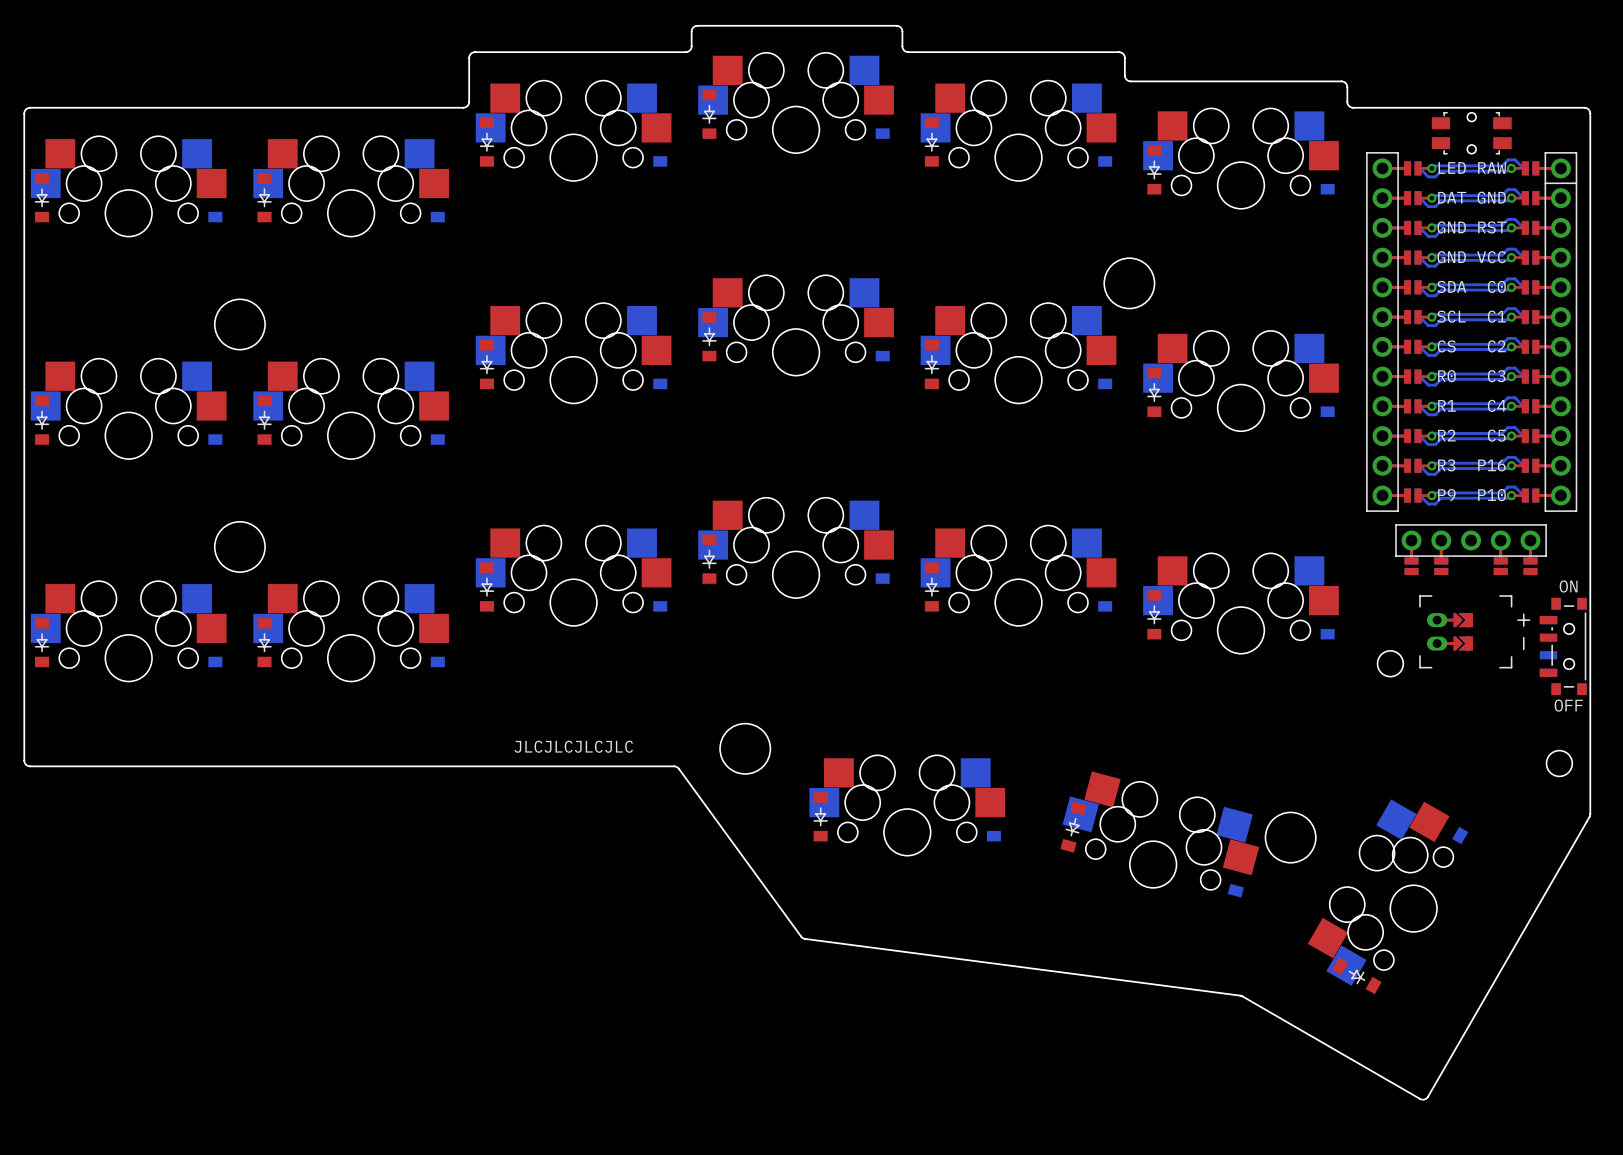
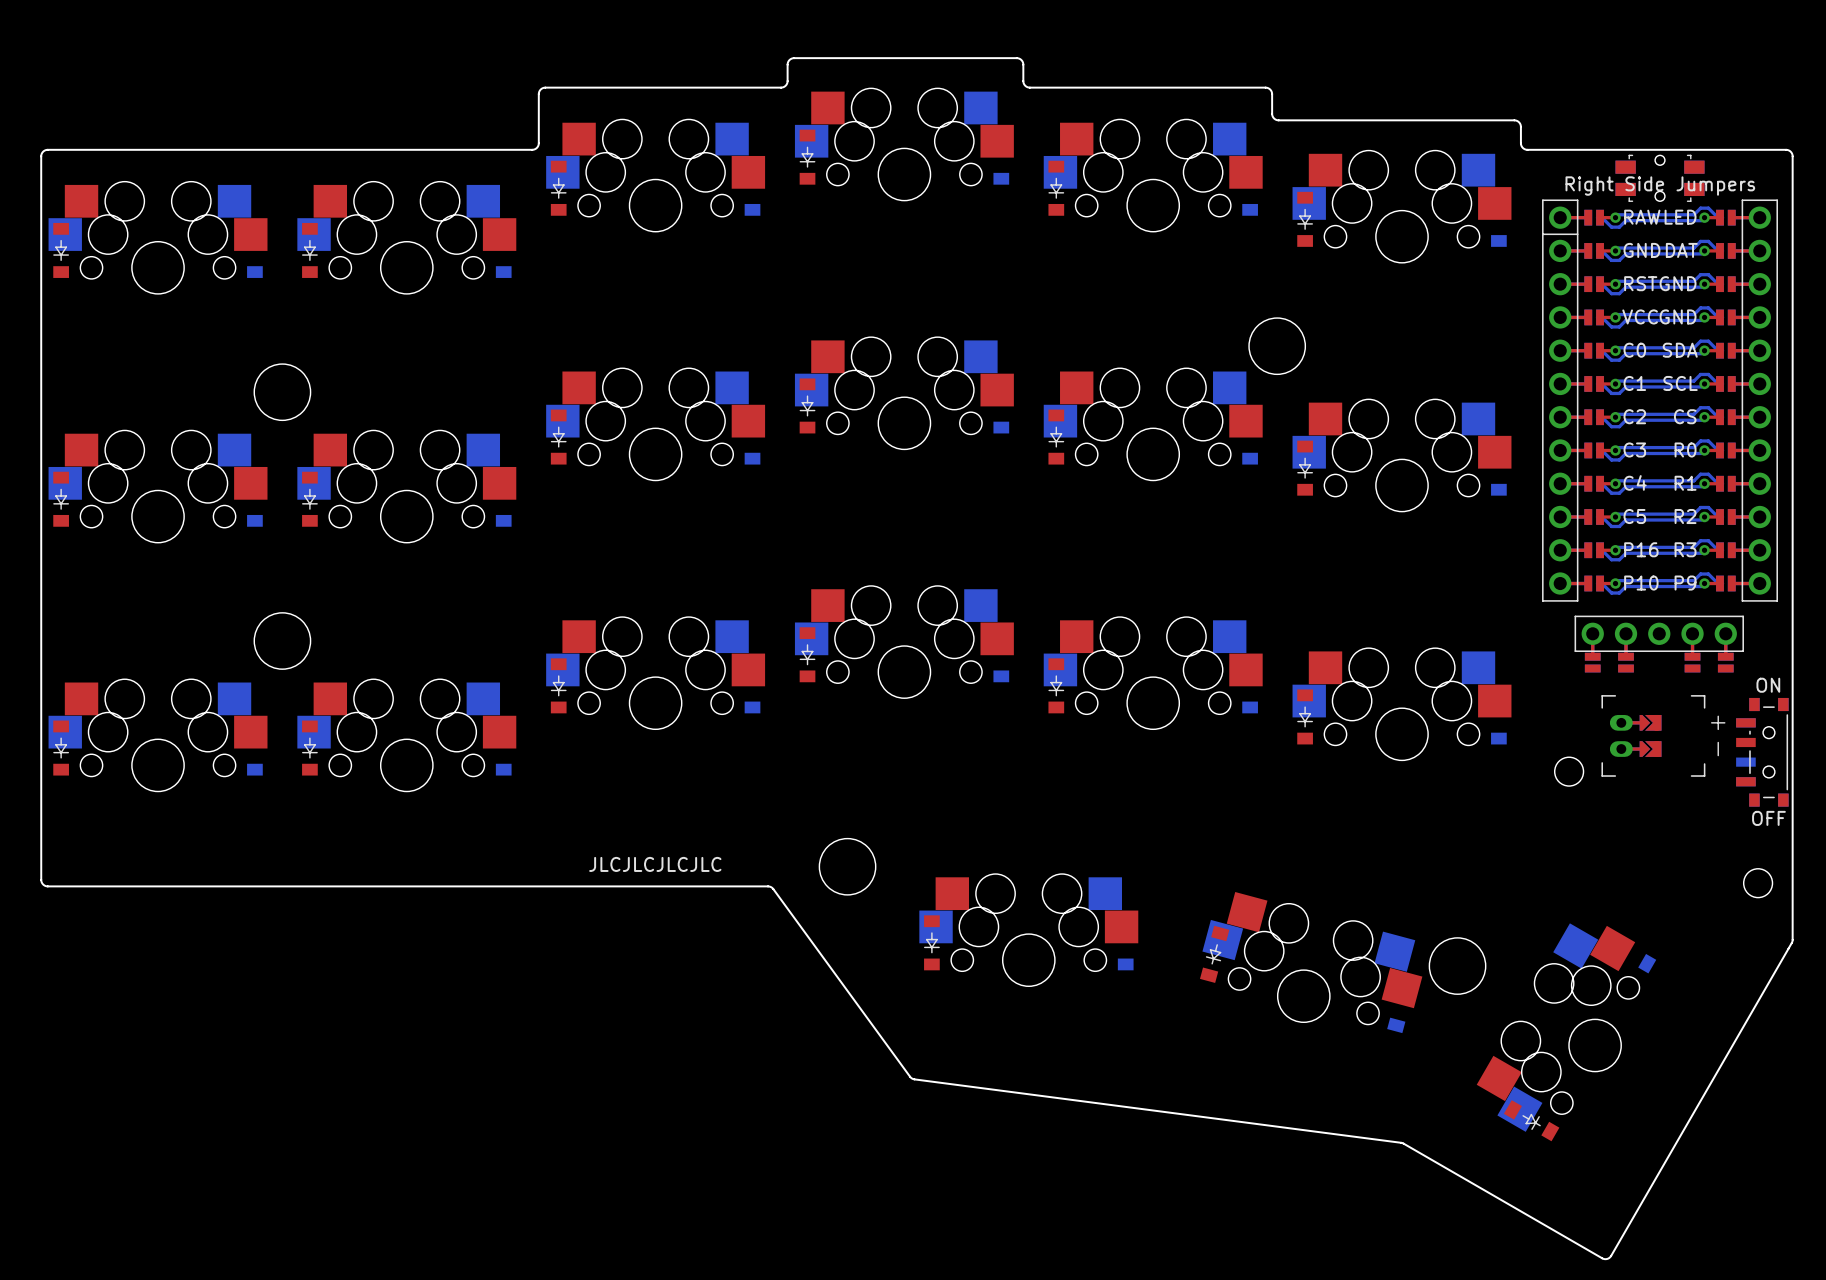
part footprint: [1366, 152, 1578, 512] -> [1542, 199, 1778, 602]

